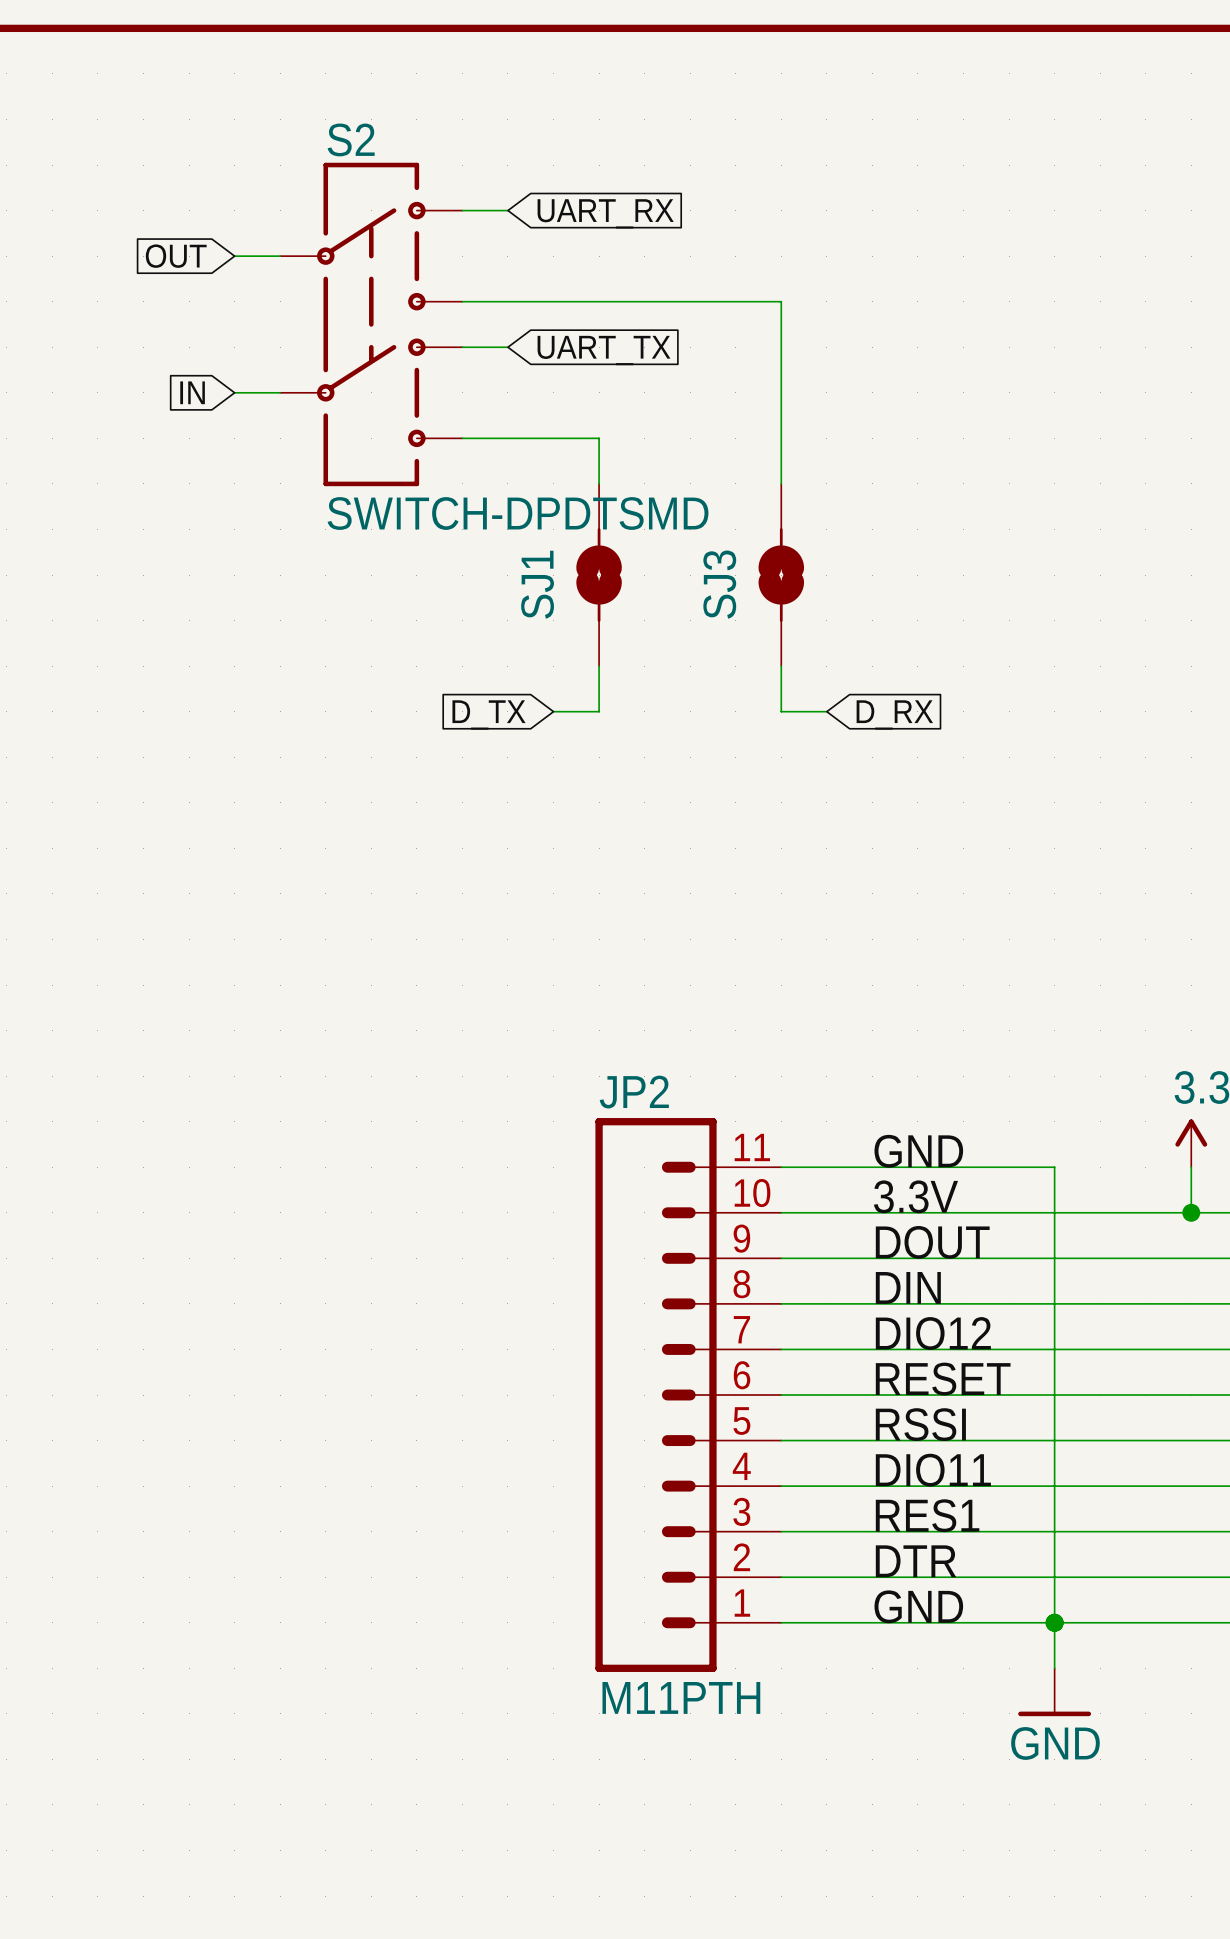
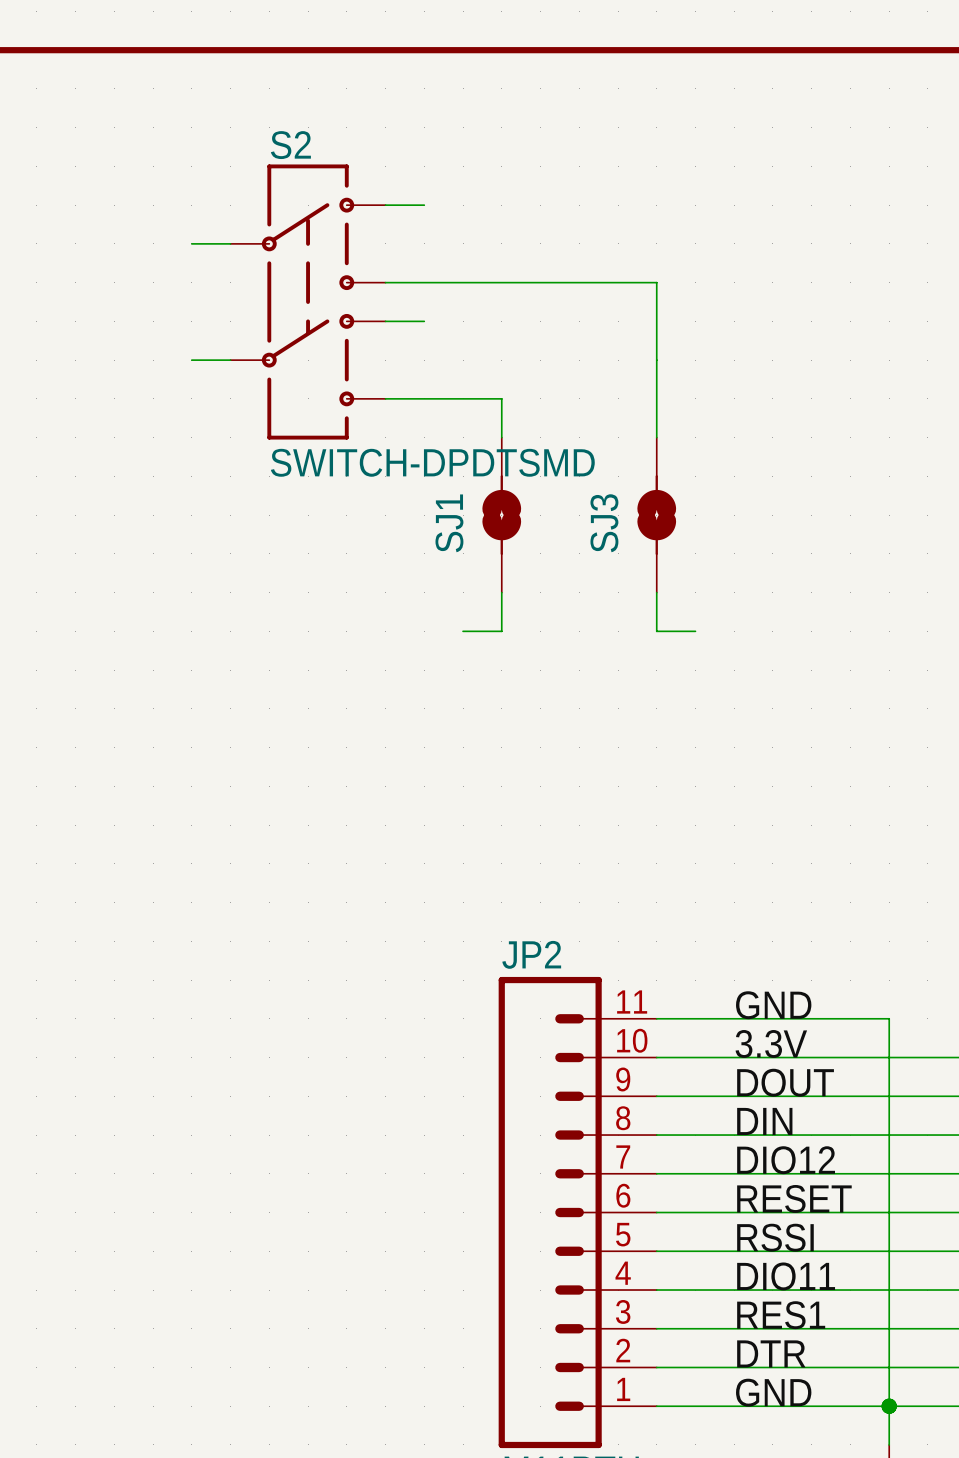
global label: UART_RX (605, 213) -> none
global label: OUT (176, 256) -> none
global label: UART_TX (604, 350) -> none
global label: IN (192, 392) -> none
global label: D_TX (489, 714) -> none
global label: D_RX (894, 714) -> none

